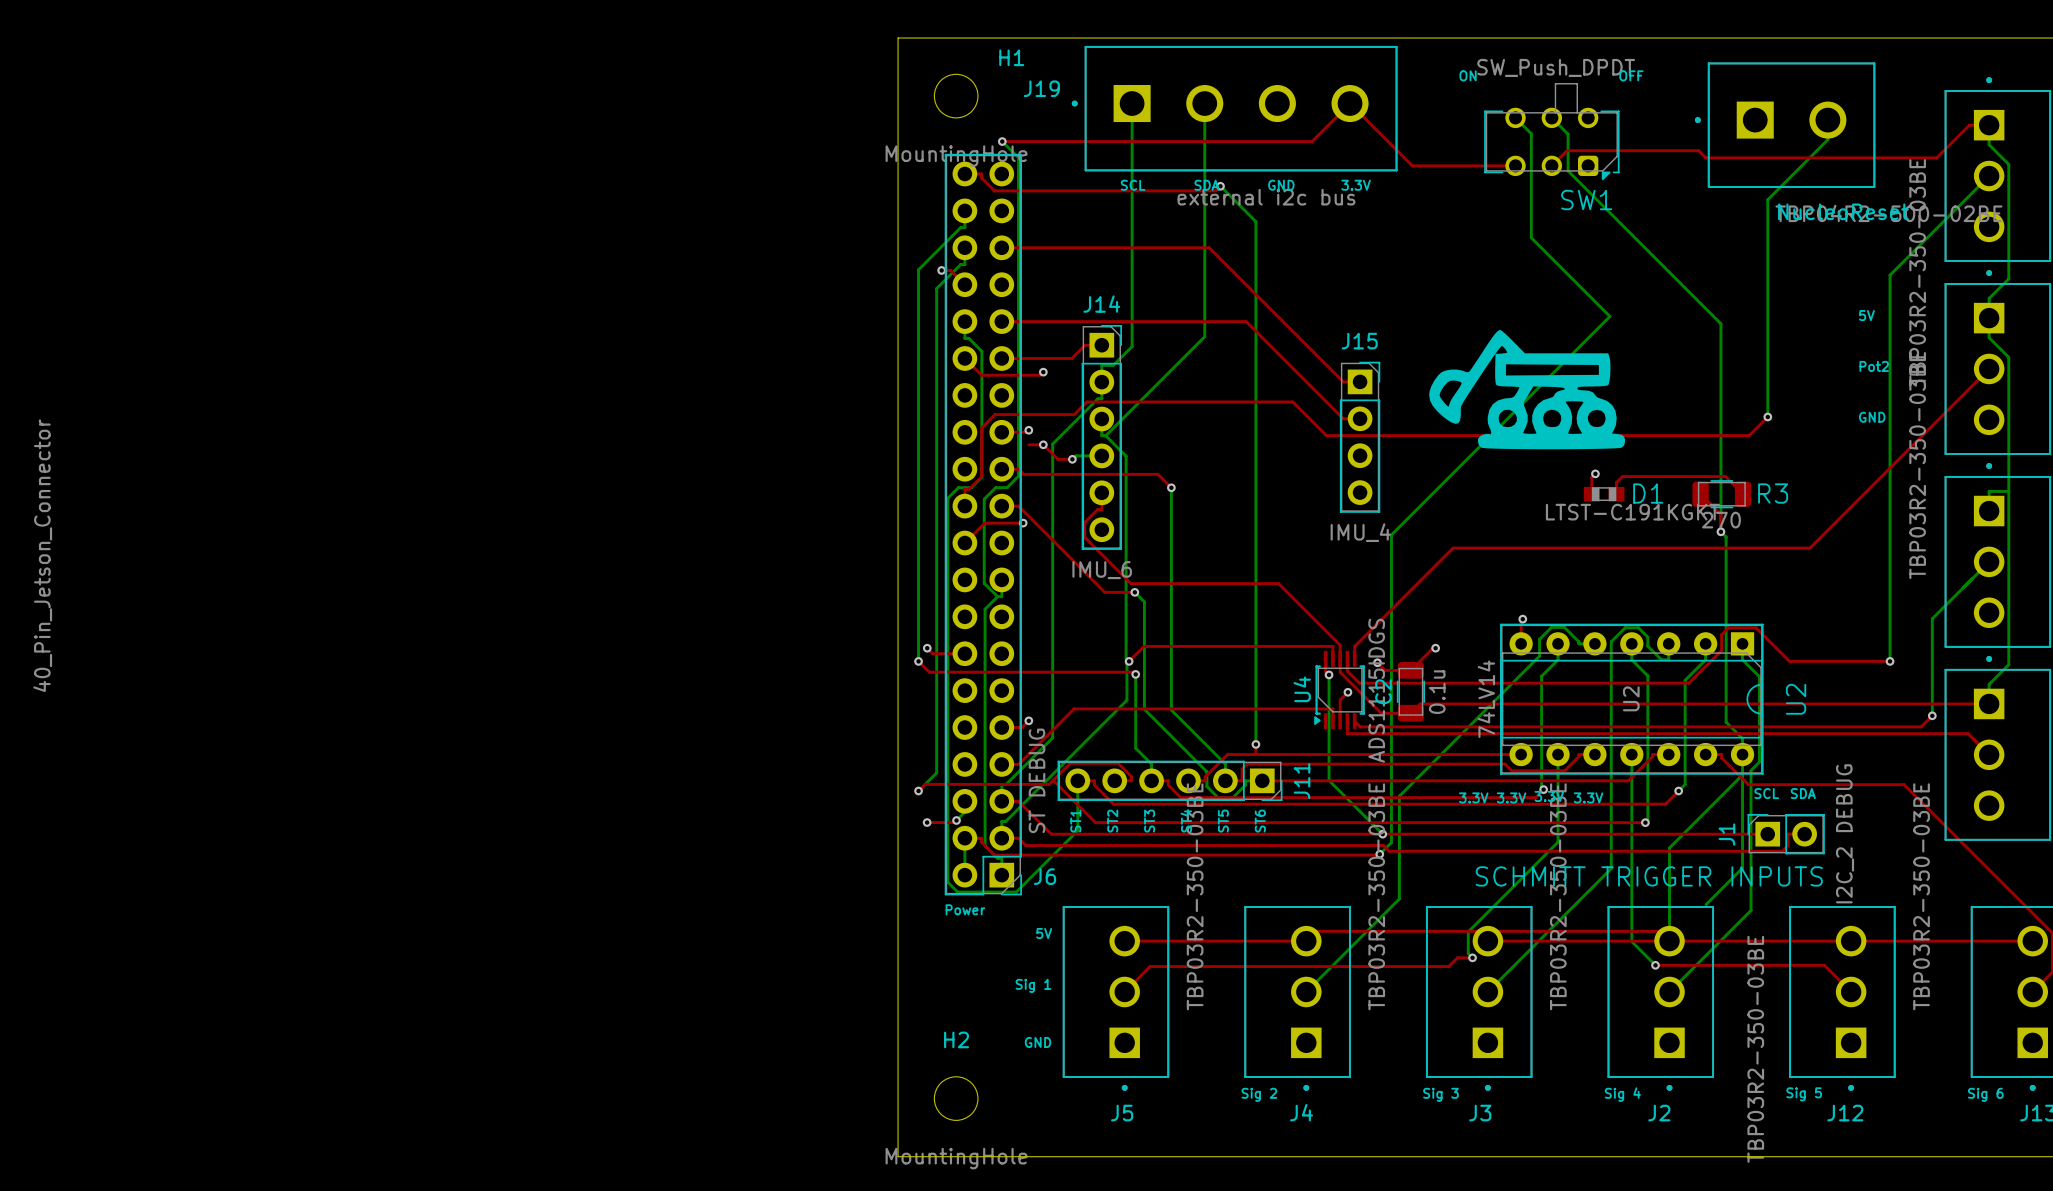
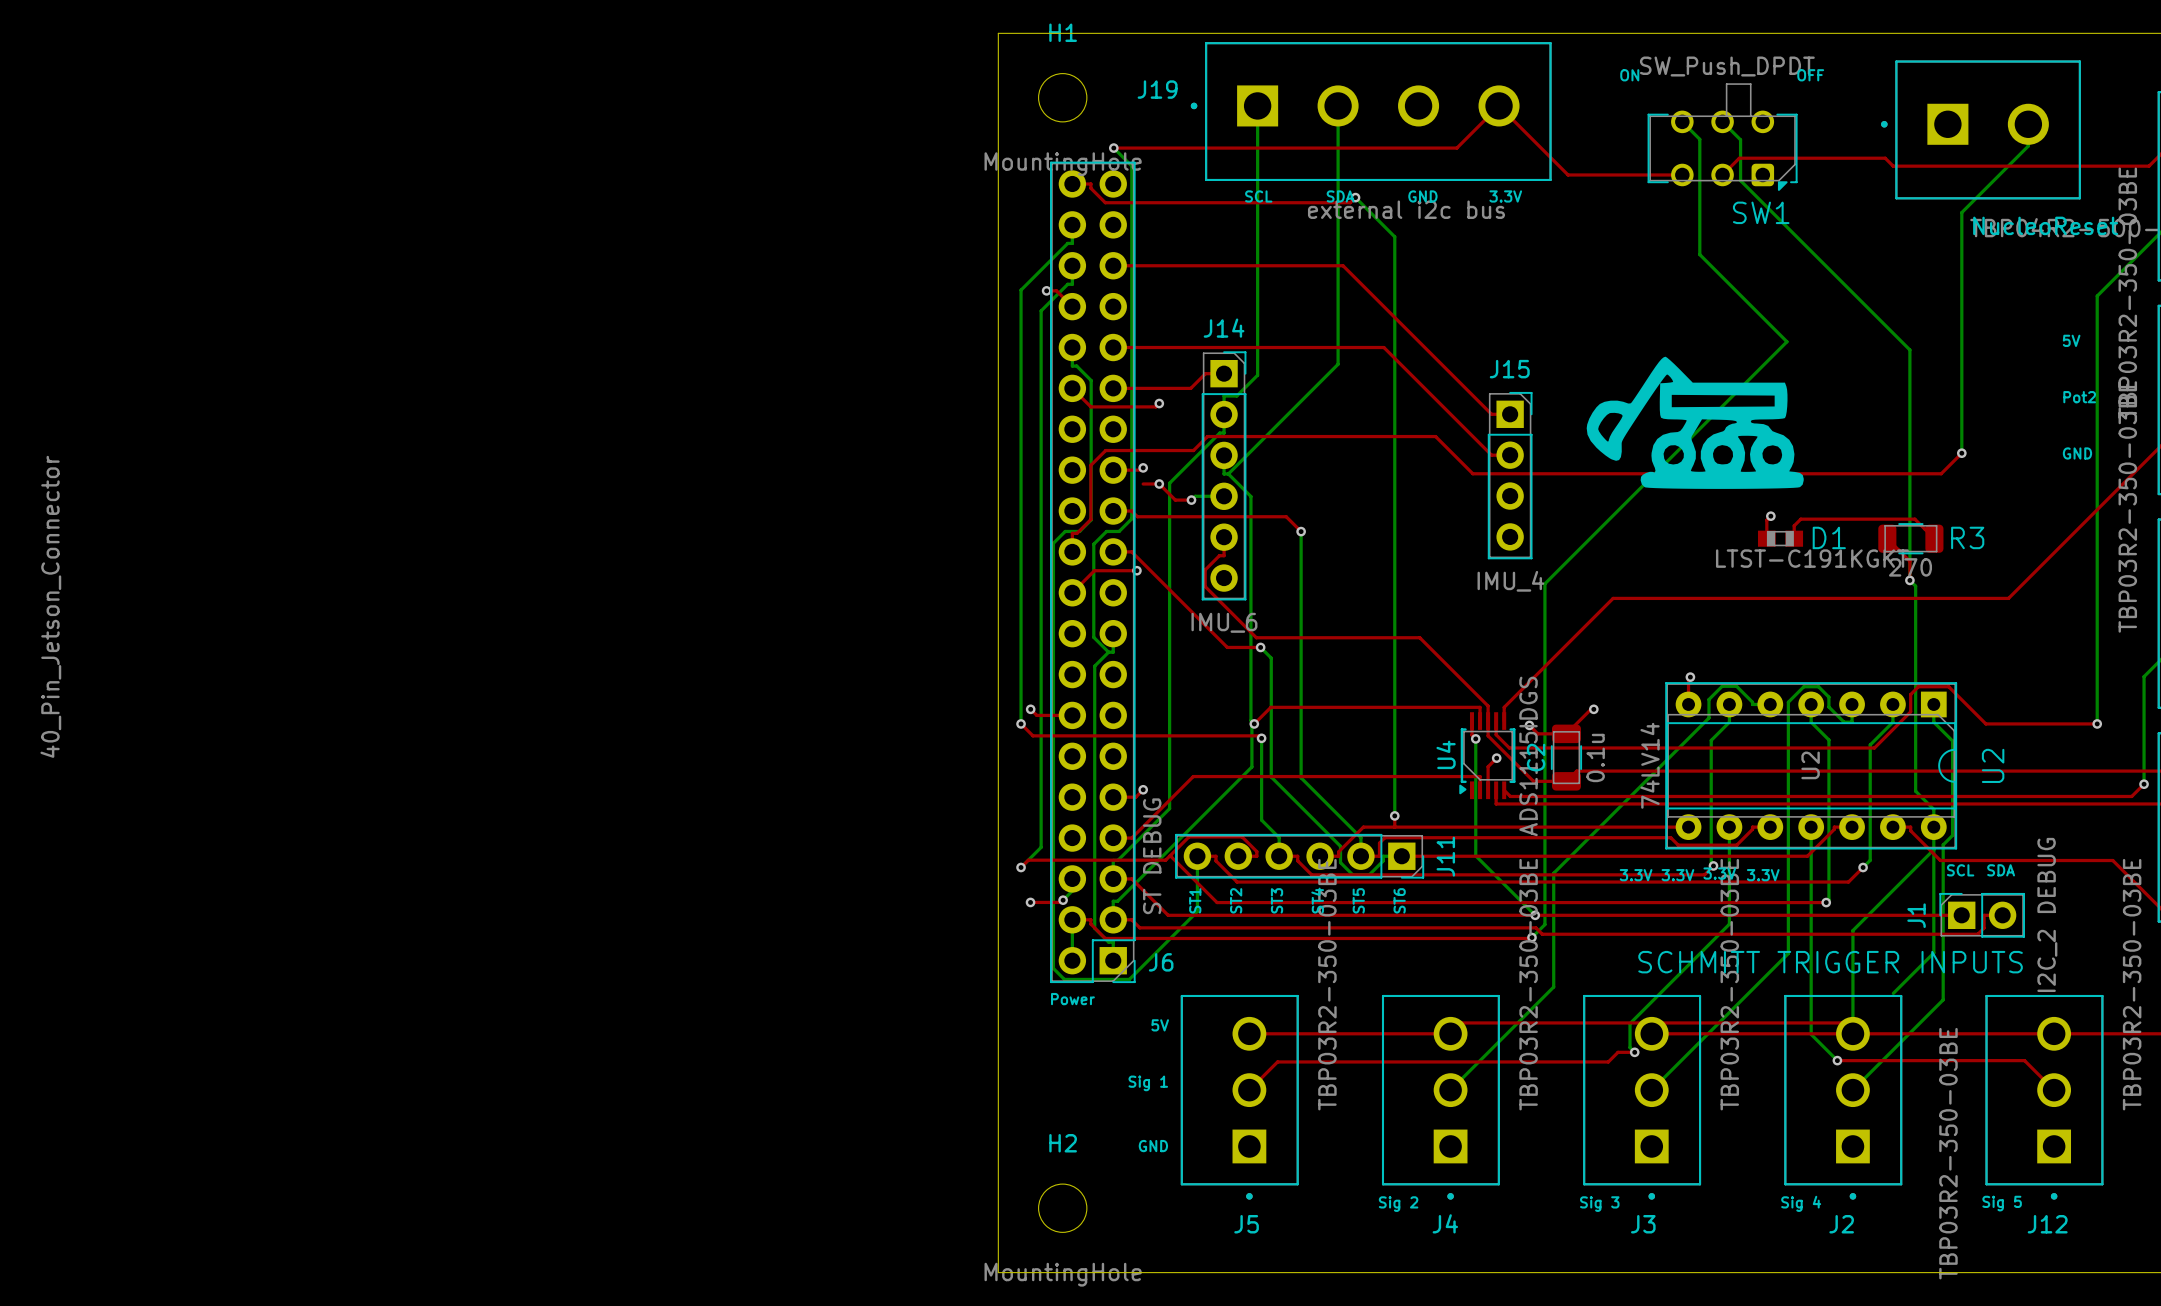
H1 name position: H1 (1011, 57) -> H1 (1063, 32)

